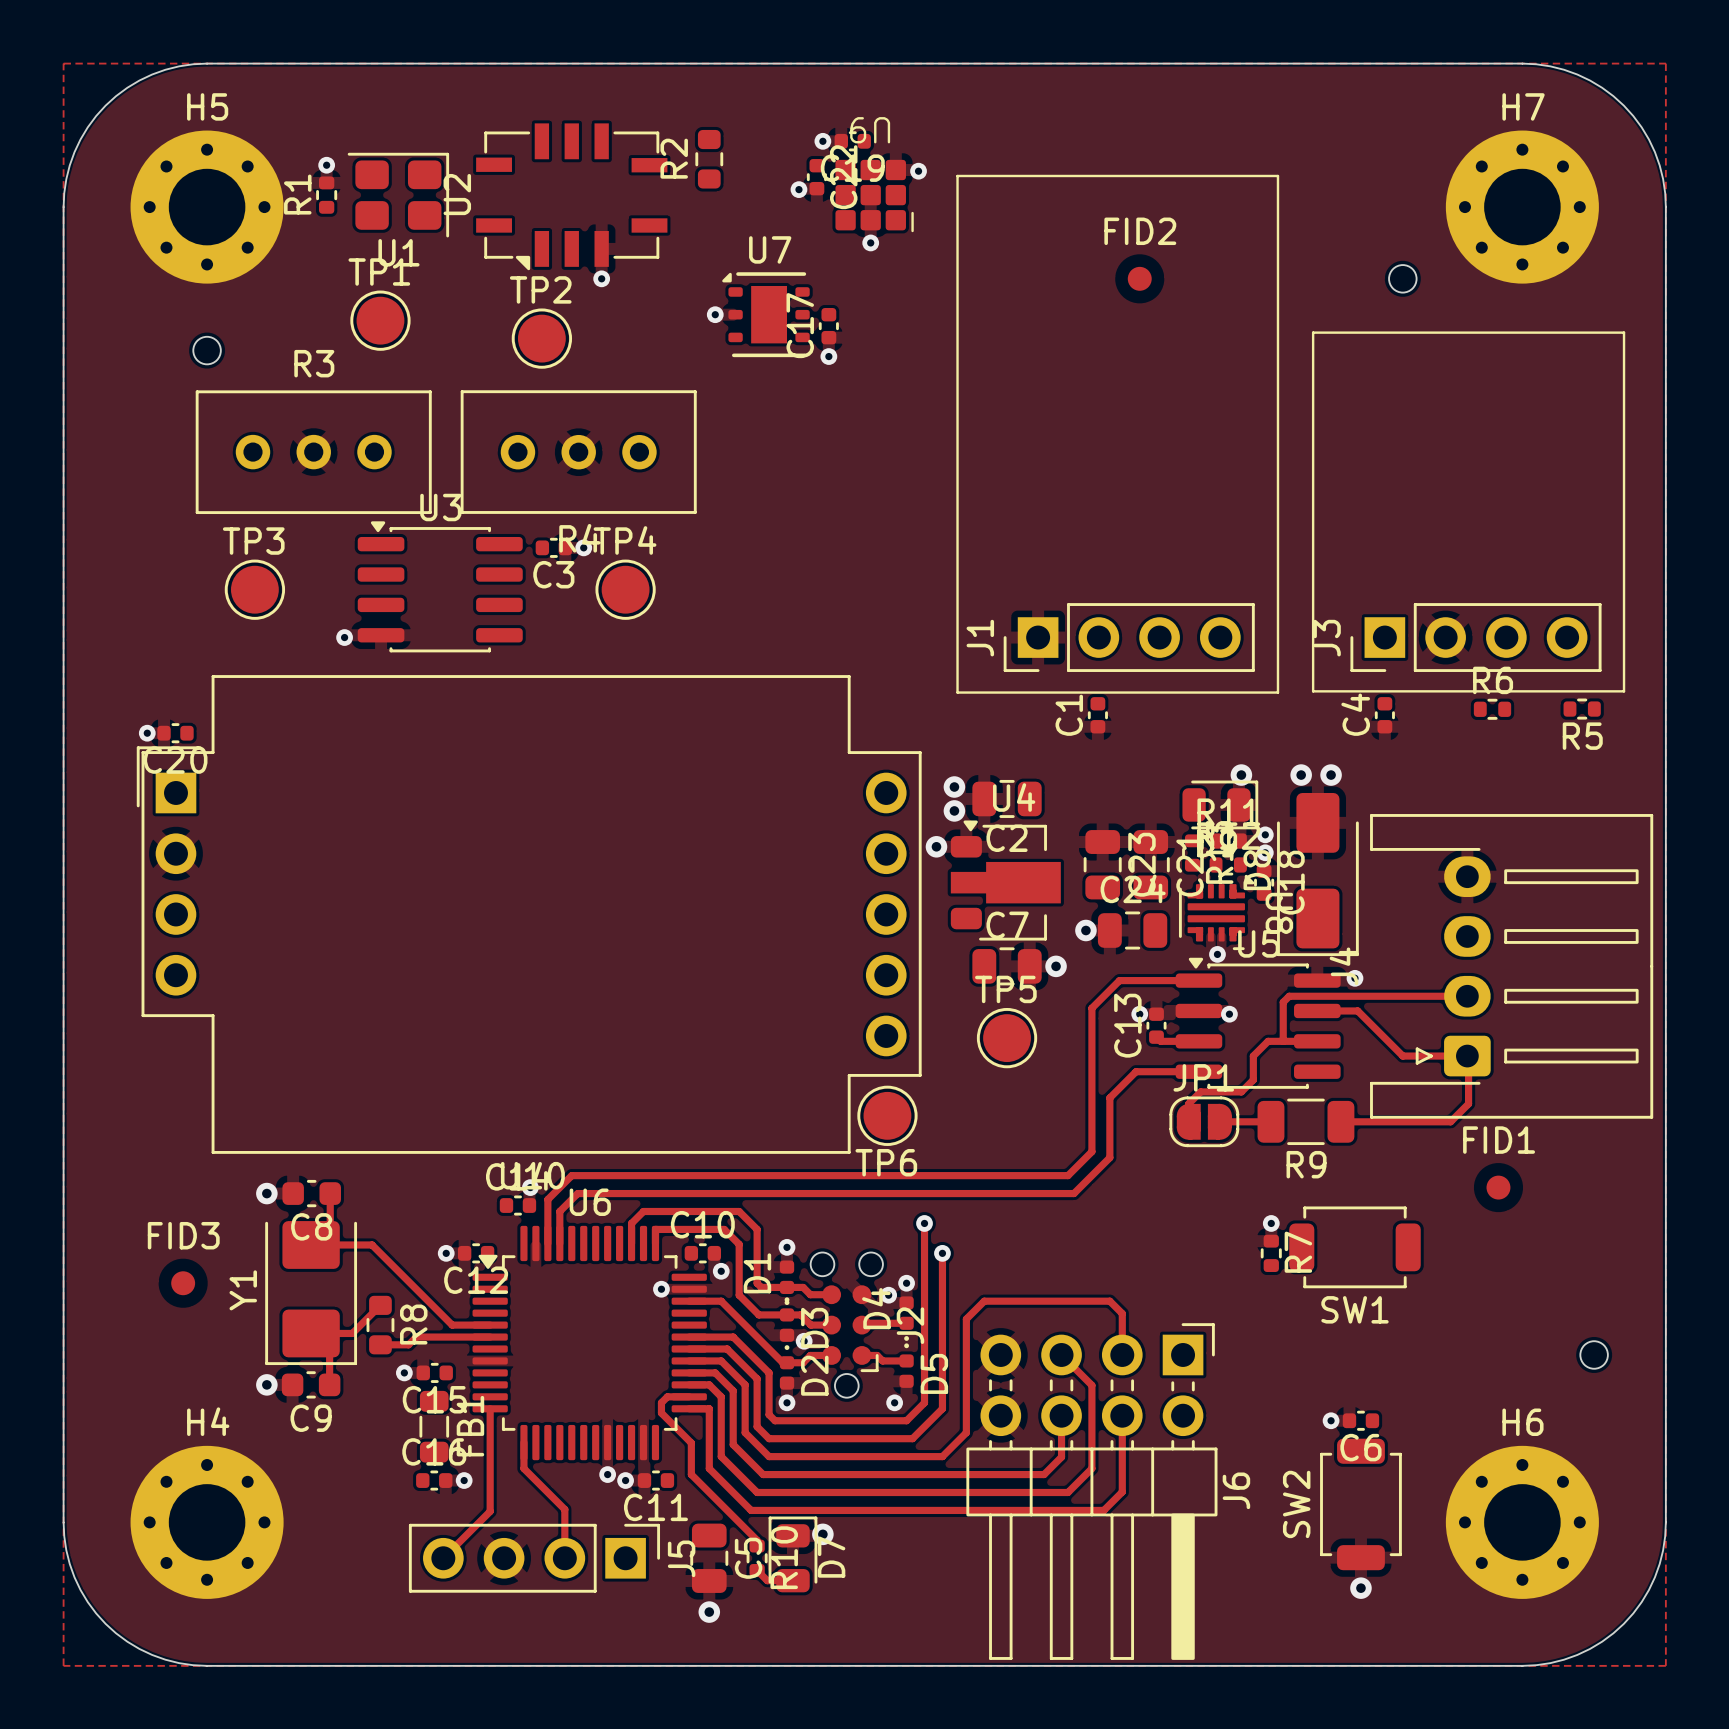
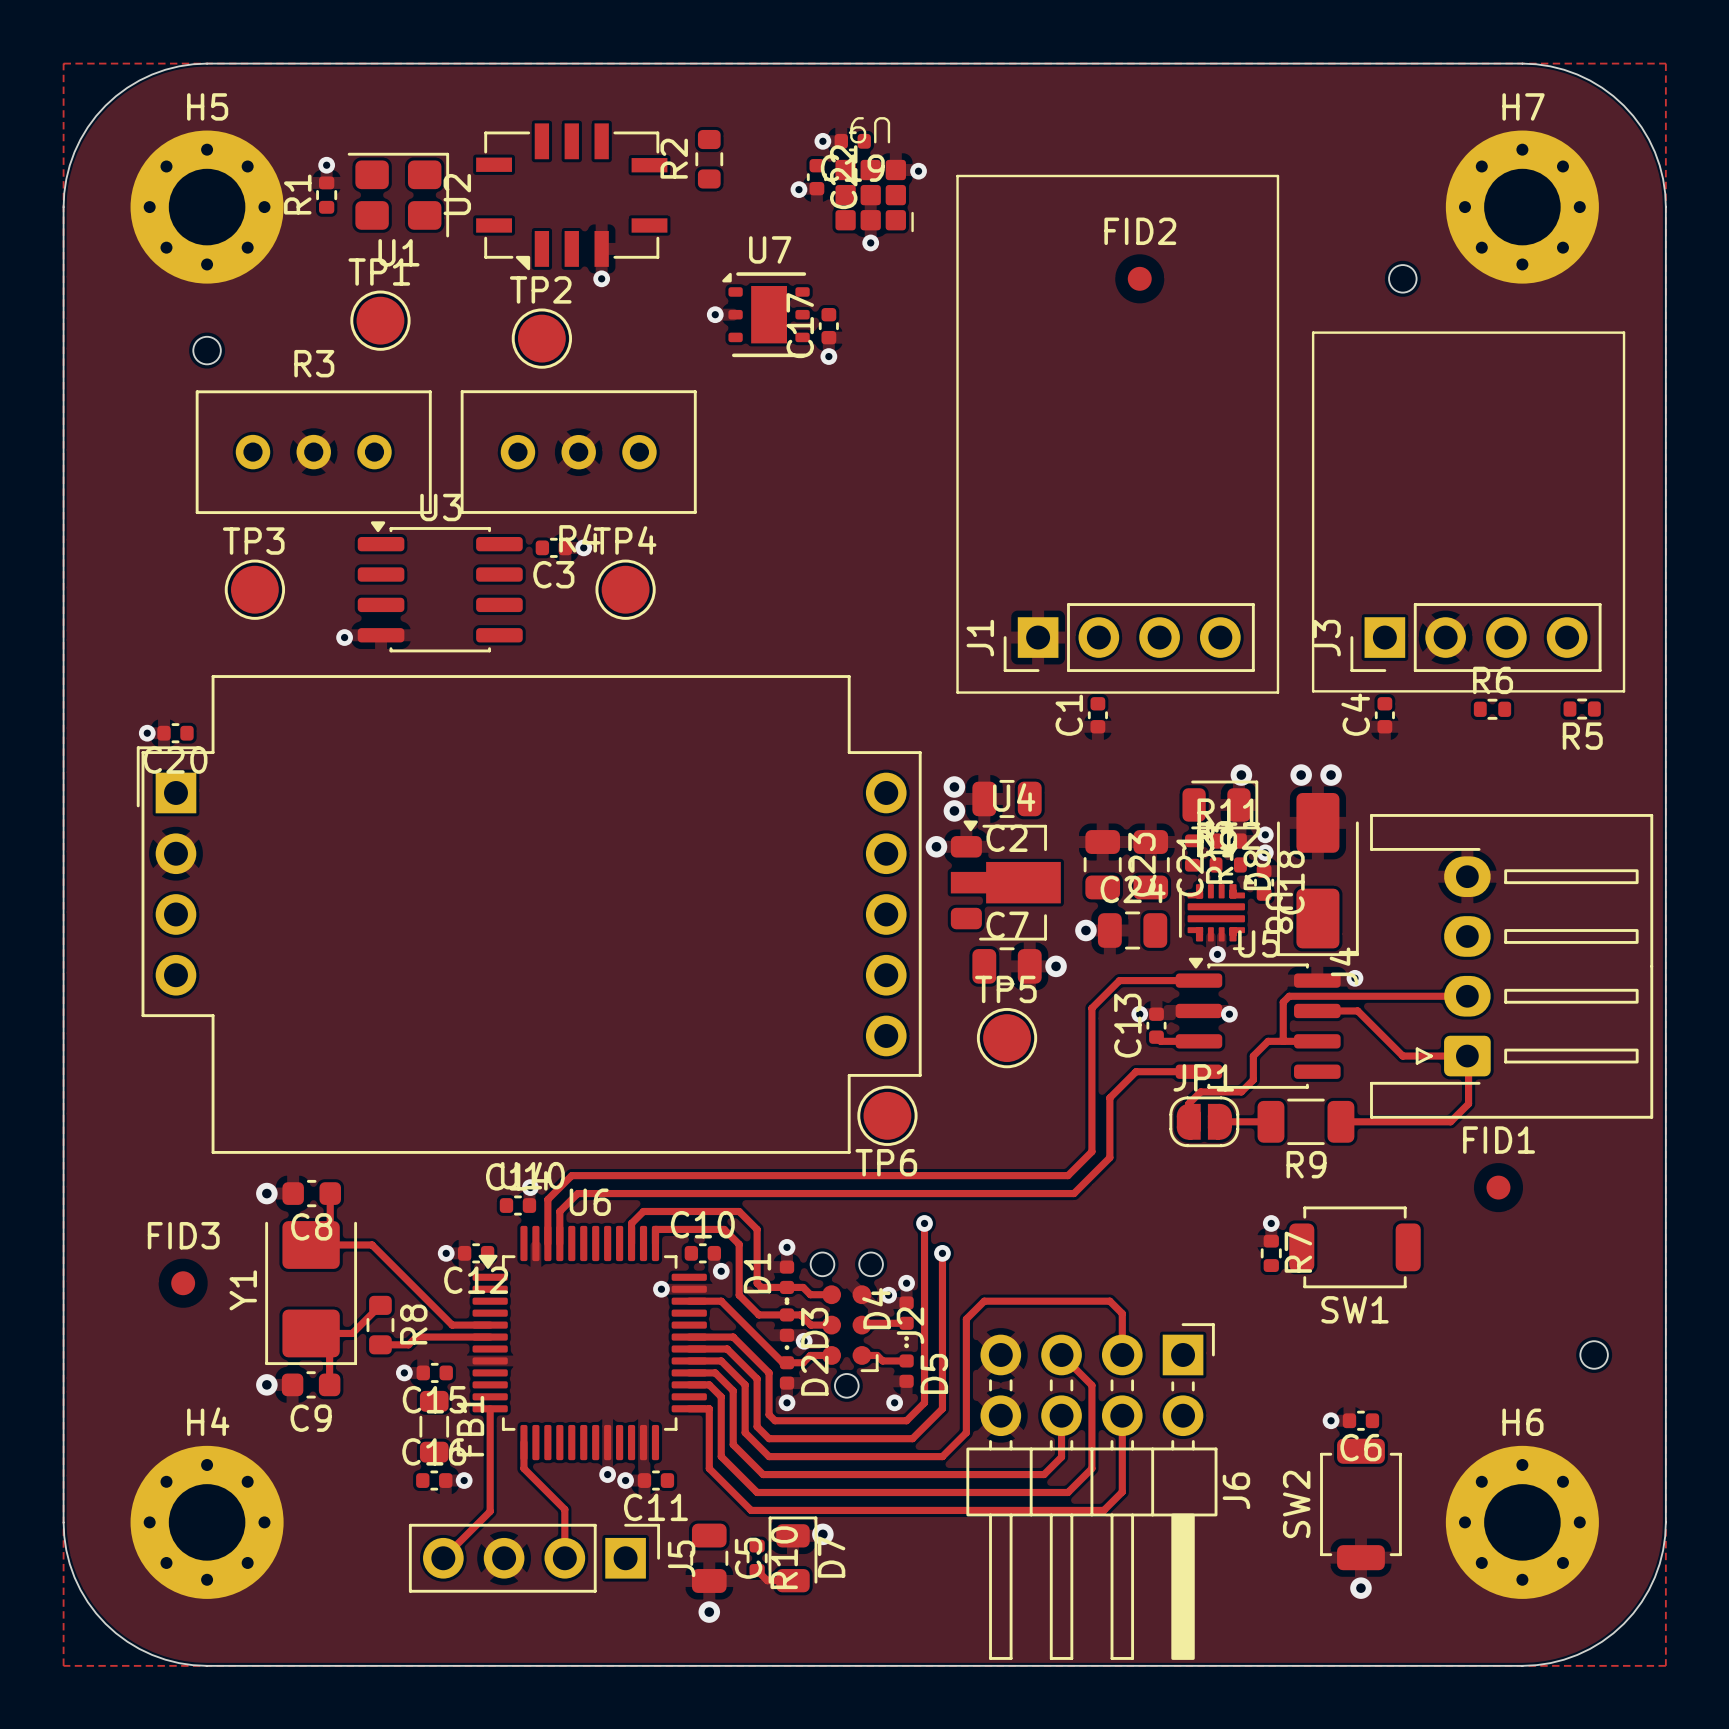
track: (689, 1396) (667, 1396) (661, 1402) (661, 1413) (691, 1442) (691, 1474) (757, 1540) (757, 1546) -> none

